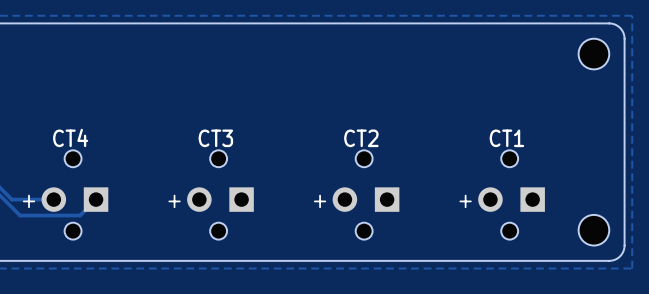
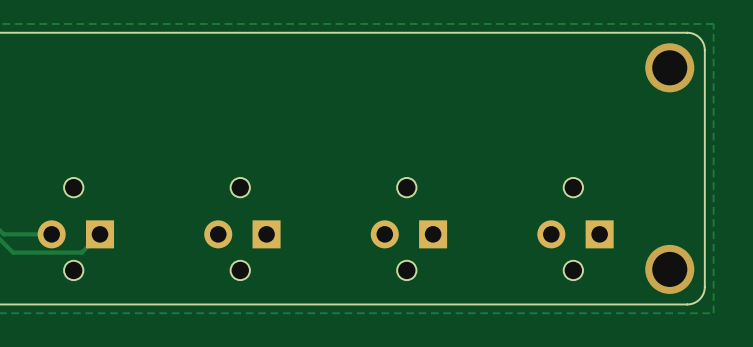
hole: (593, 54) -> none
via: none -> (669, 67)
text: CT4 (70, 137) -> none
text: CT3 (215, 138) -> none
text: CT2 (361, 138) -> none
text: CT1 (506, 138) -> none
text: + (28, 201) -> none
text: + (174, 201) -> none
text: + (320, 201) -> none
text: + (465, 201) -> none
hole: (593, 230) -> none
via: none -> (669, 269)

